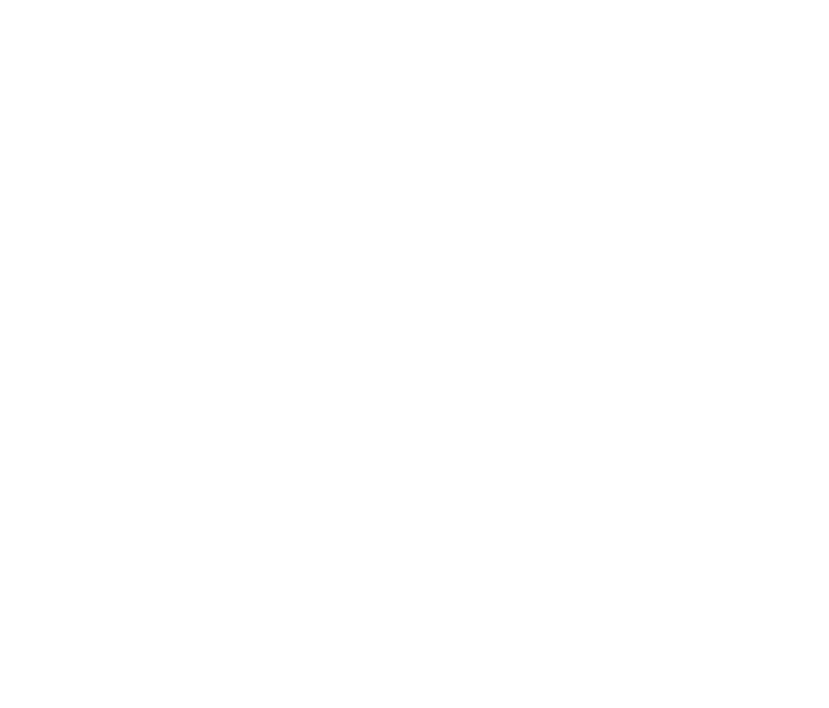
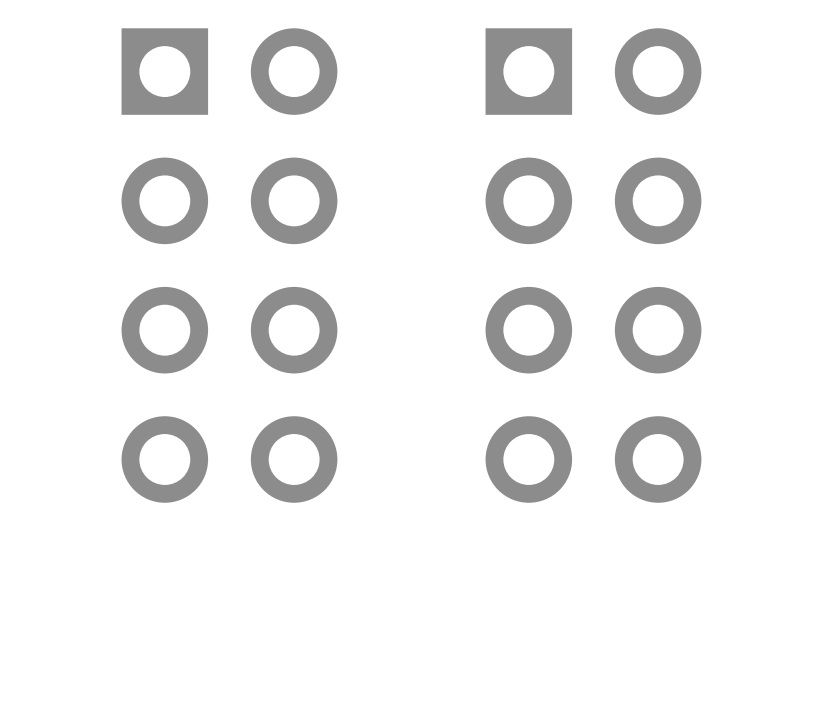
part: none -> (229, 265)
part: none -> (593, 265)

